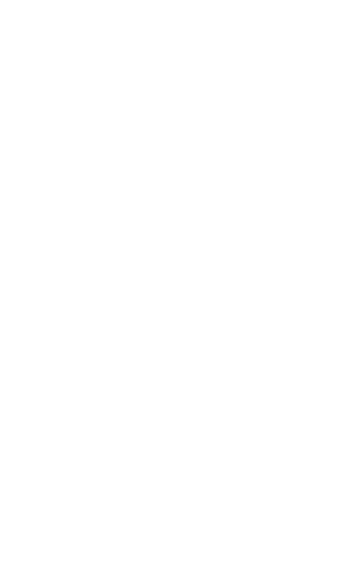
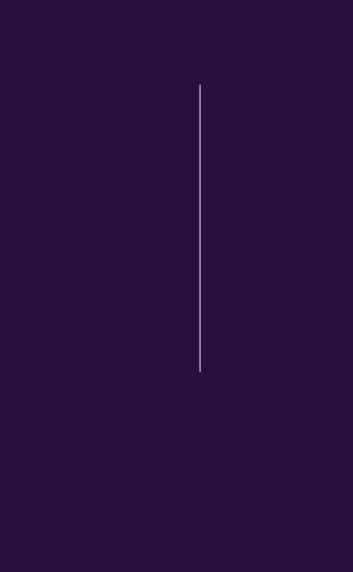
part: none -> (200, 228)

